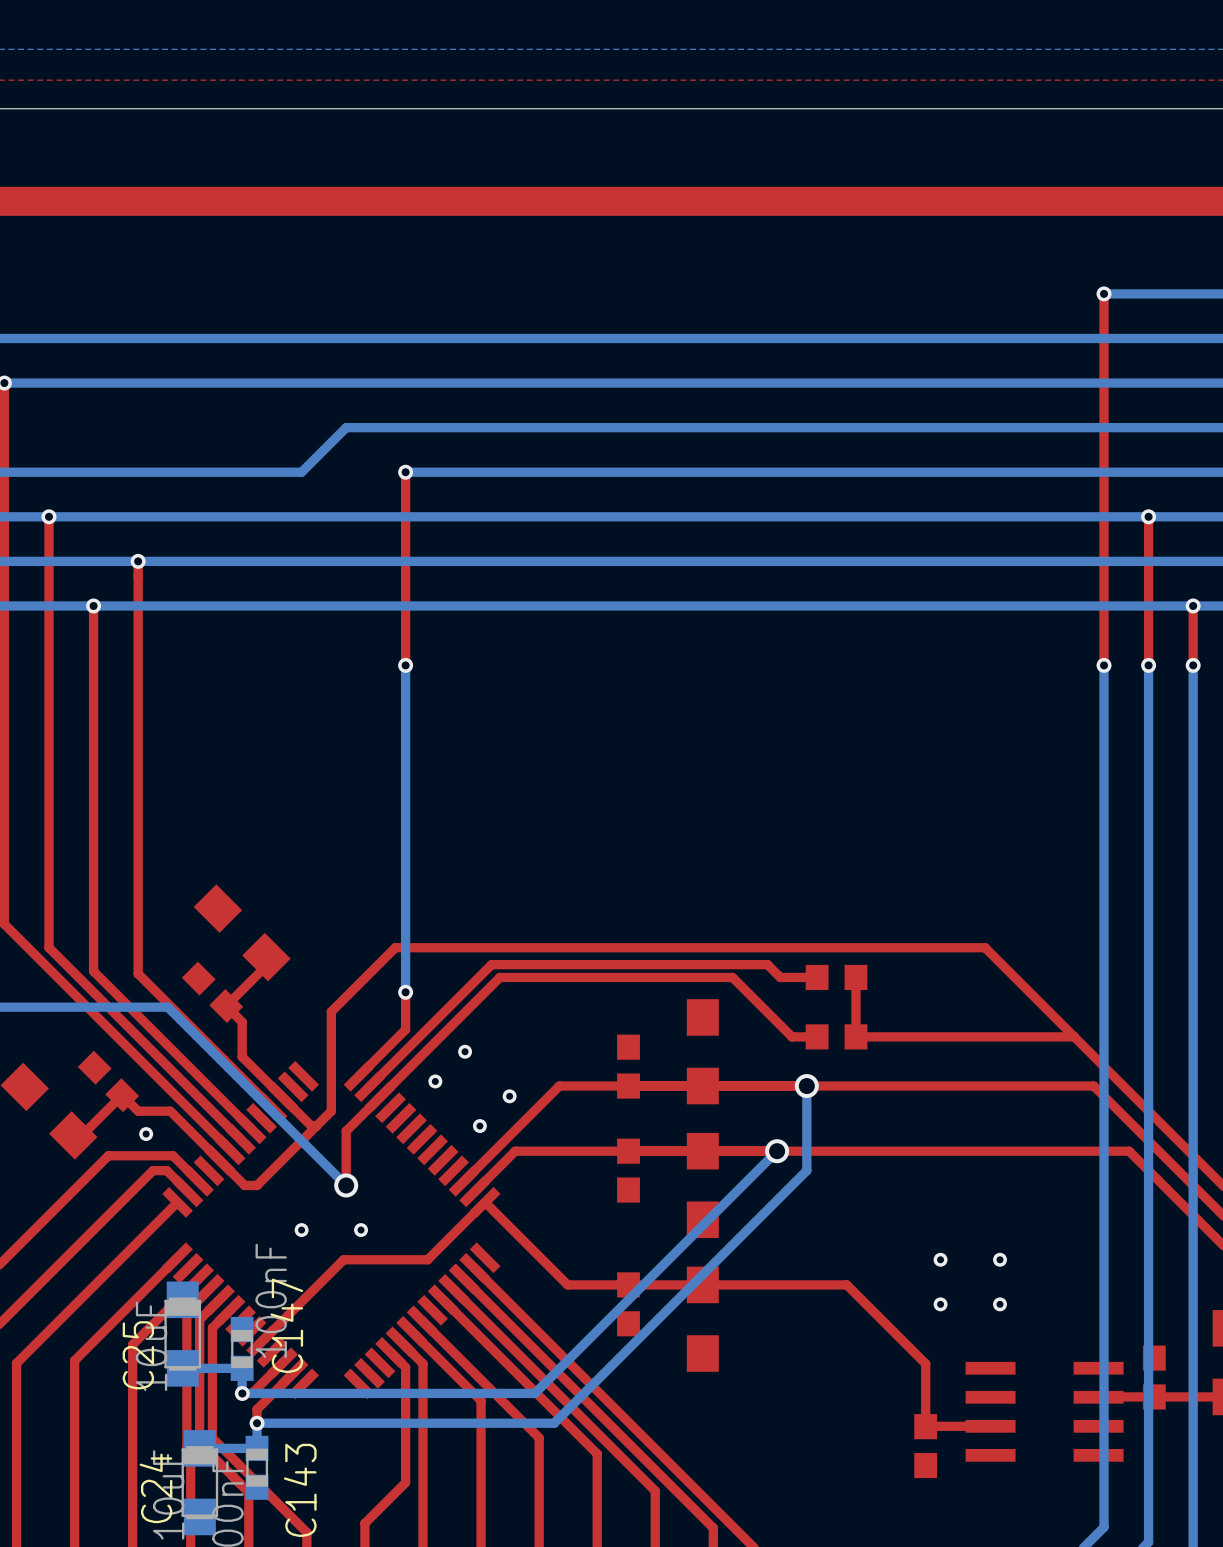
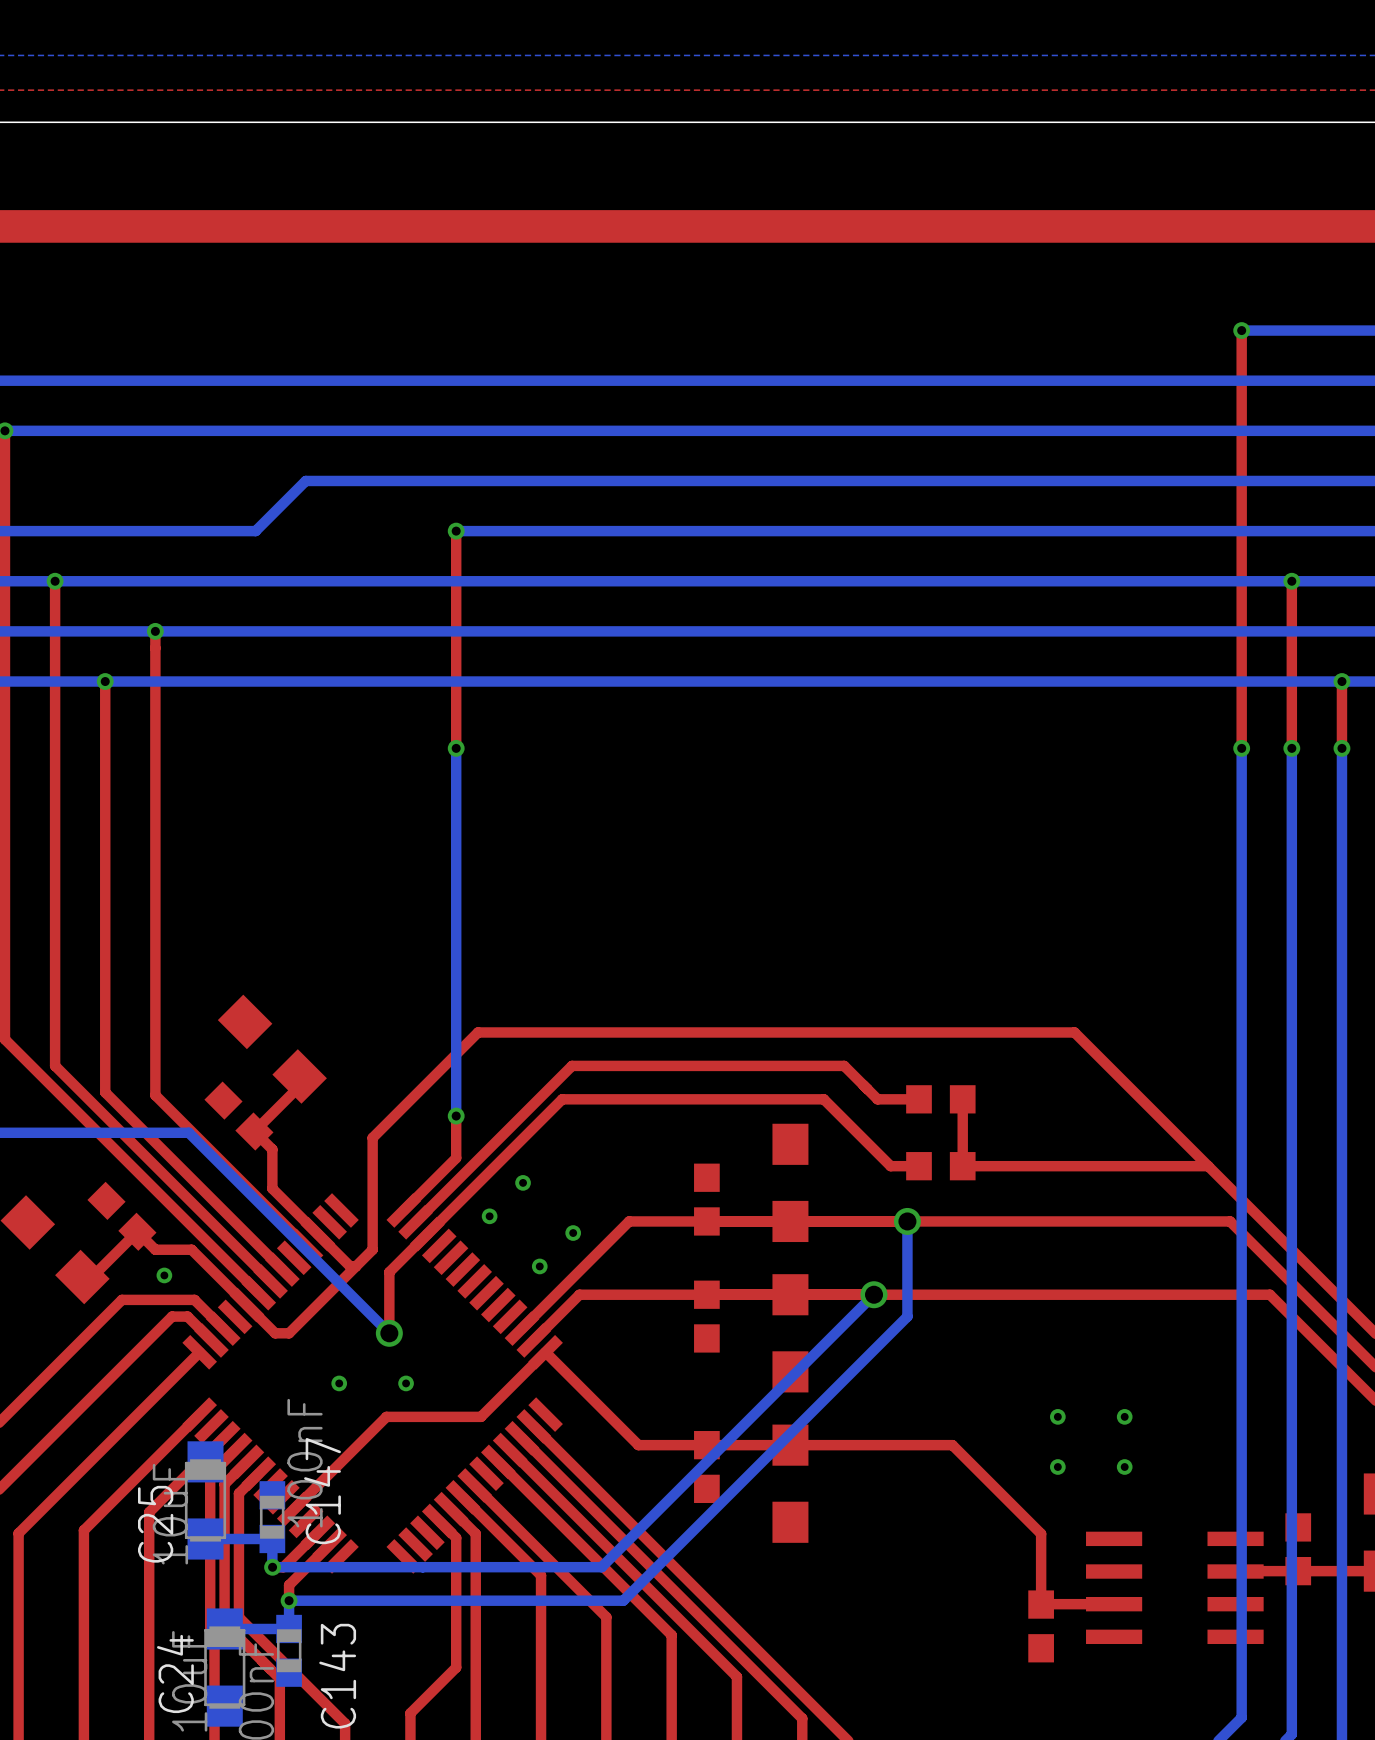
bottom track: (346, 427) (301, 472) (227, 472) -> (389, 480) (305, 480) (255, 531)
top track: (508, 947) (395, 947) -> (572, 1065) (552, 1084)
top track: (985, 947) (750, 947) -> (863, 1084) (844, 1065)
top track: none -> (1107, 1065) (1074, 1032) (478, 1032) (444, 1065)
top track: (767, 964) (491, 964) -> none

